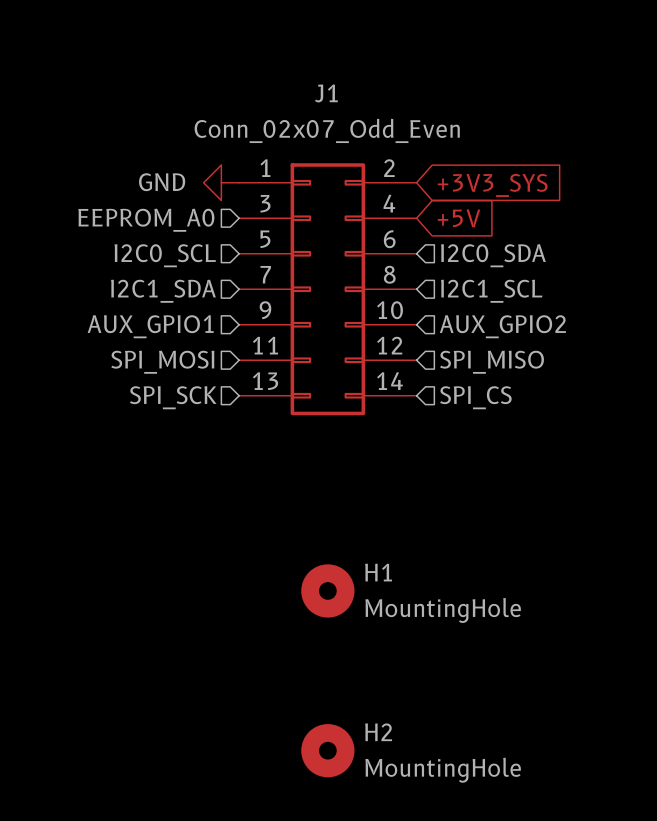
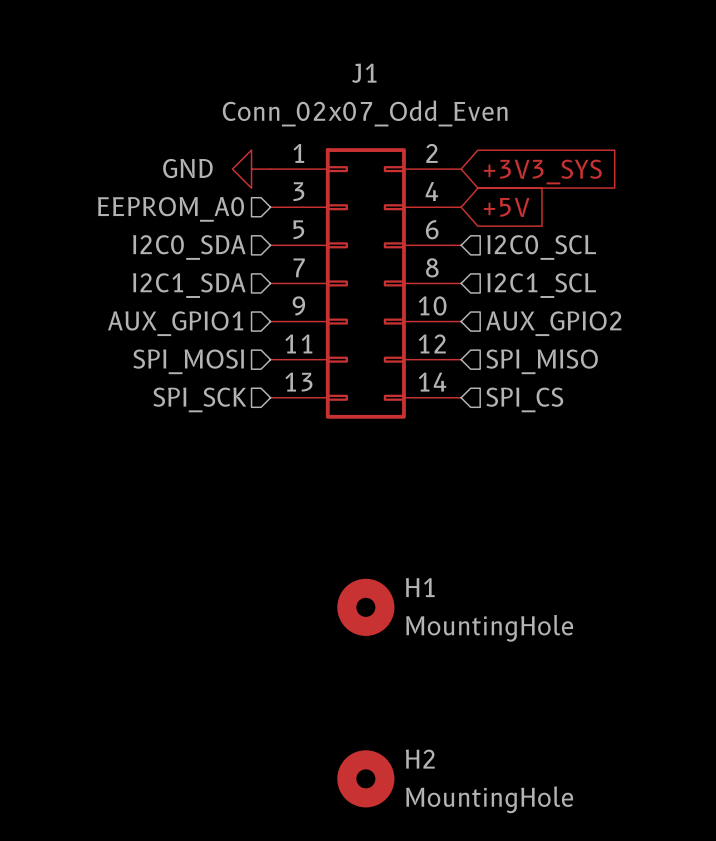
hierarchical label: I2C0_SCL (165, 255) -> I2C0_SDA (189, 247)
hierarchical label: I2C0_SDA (493, 255) -> I2C0_SCL (541, 247)

